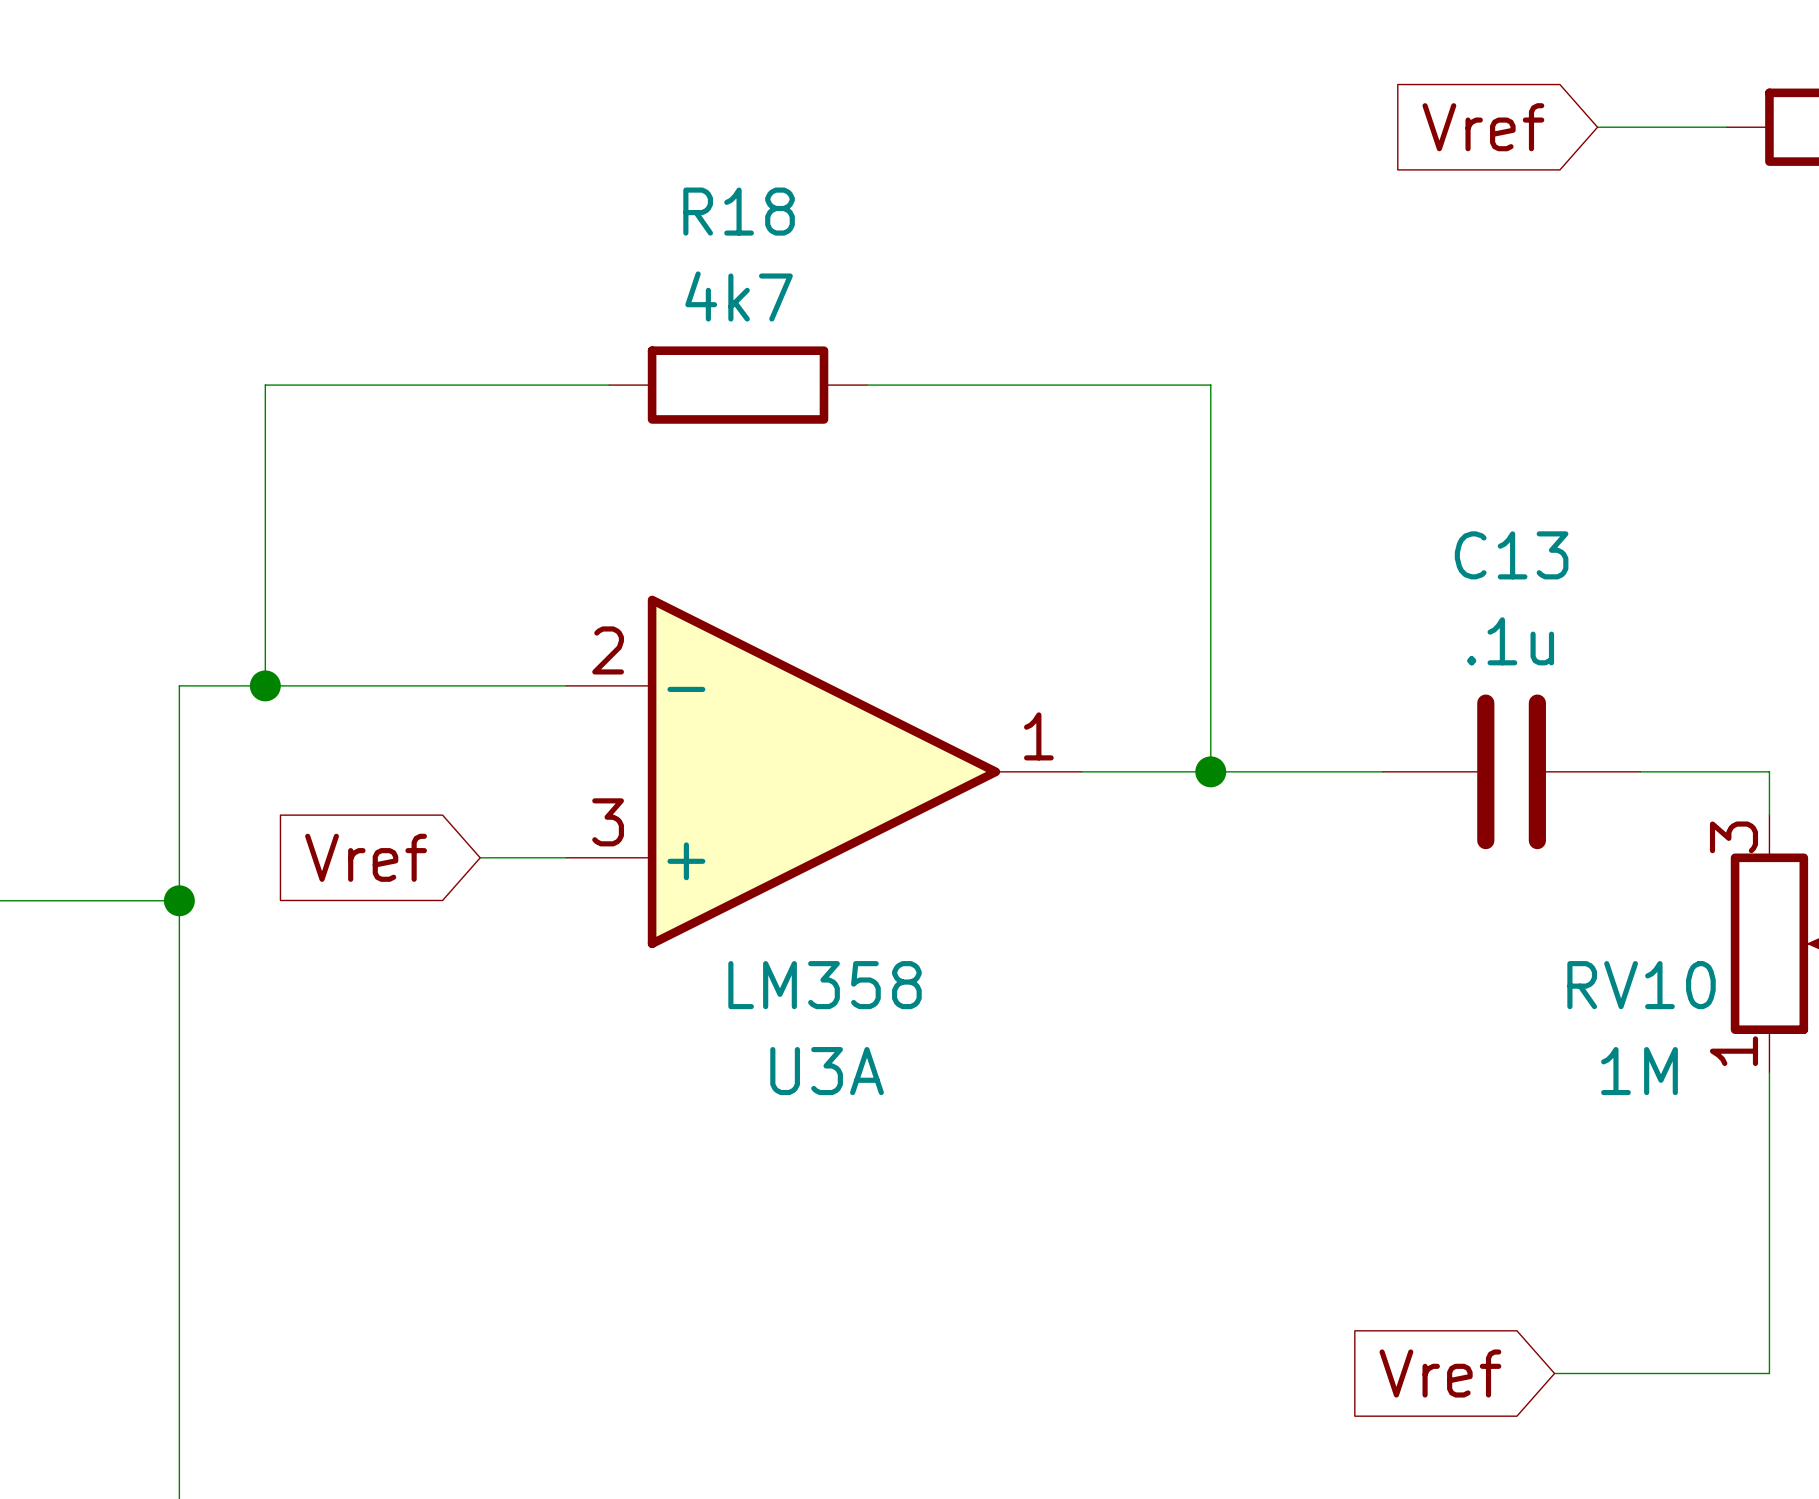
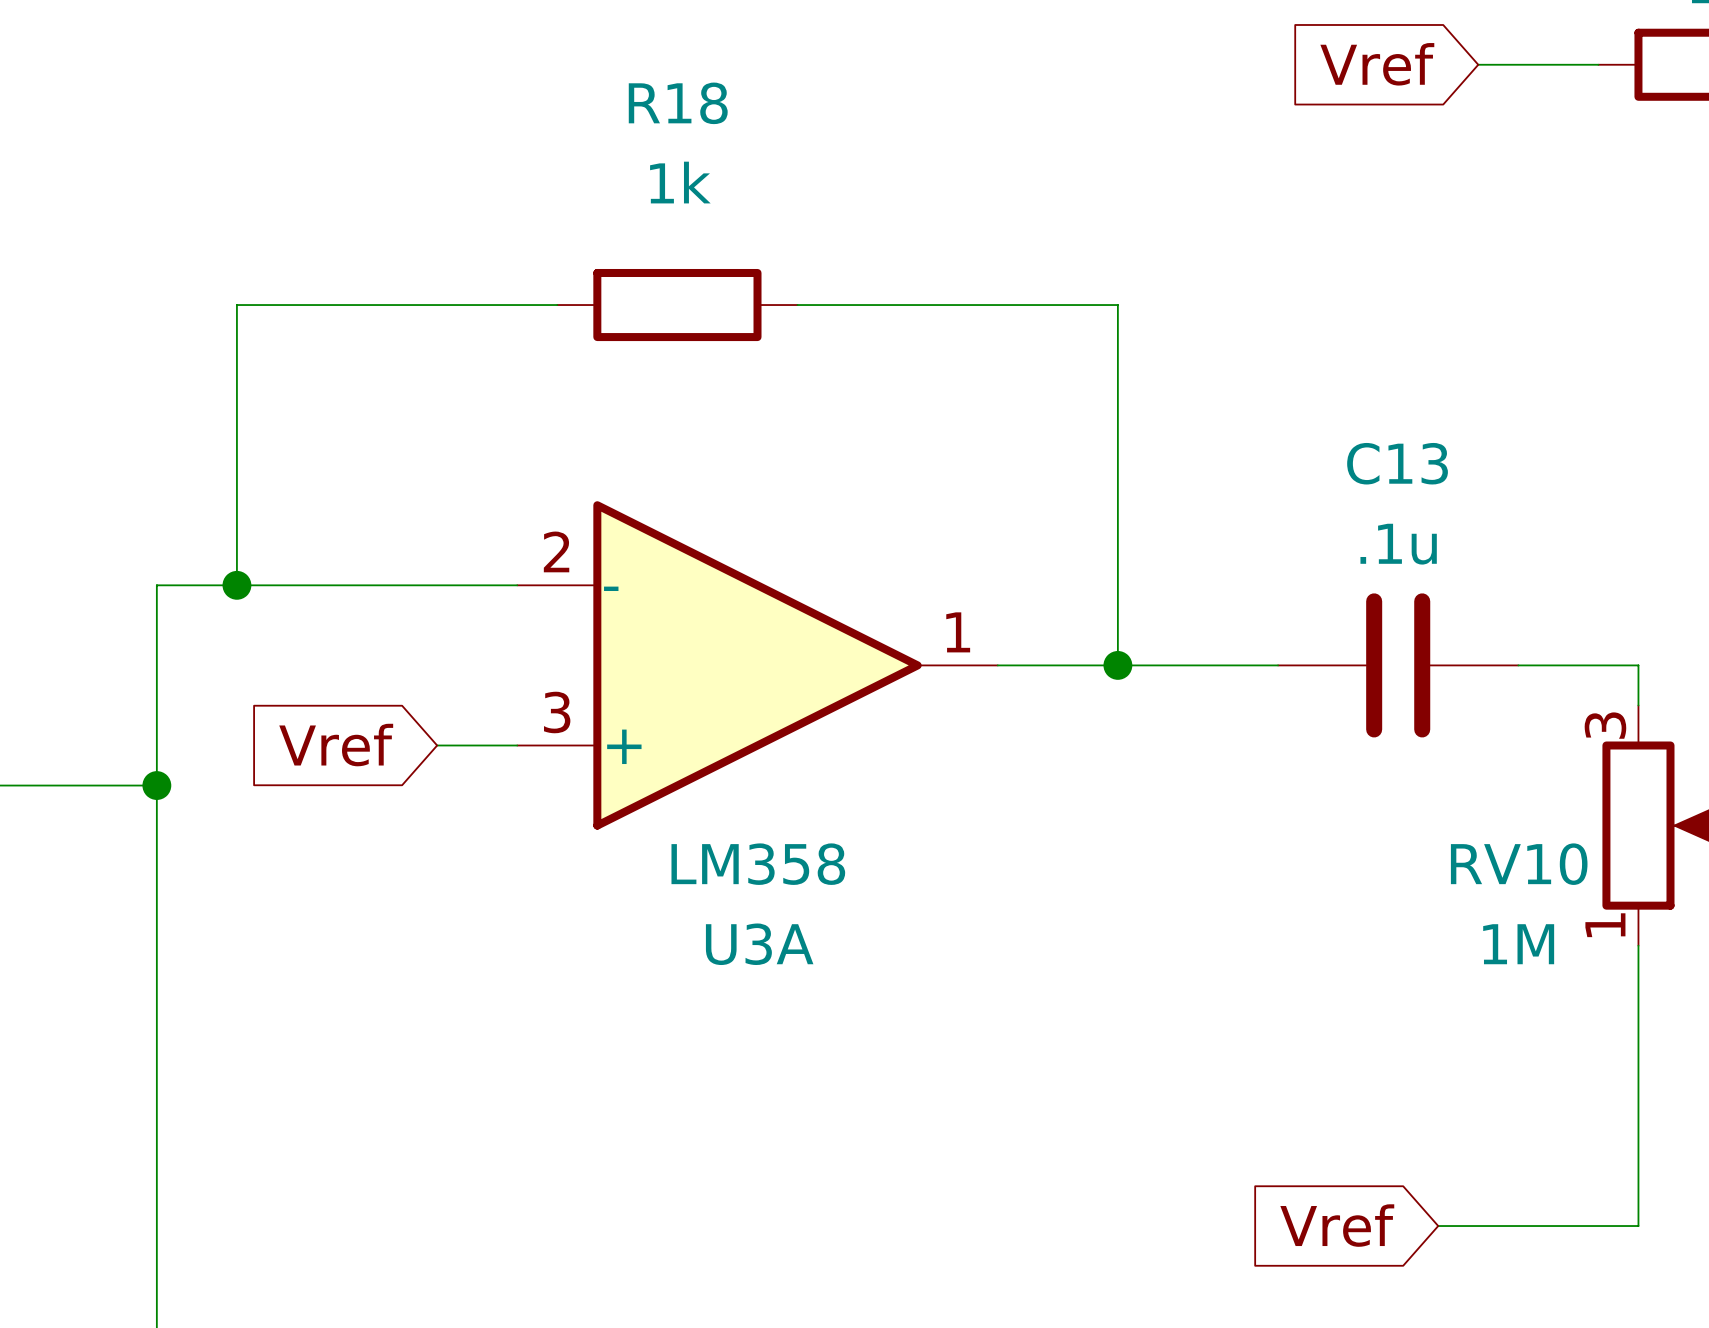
R18 name position: R18 (739, 211) -> R18 (678, 103)
R18 value: 4k7 (739, 296) -> 1k (680, 182)

